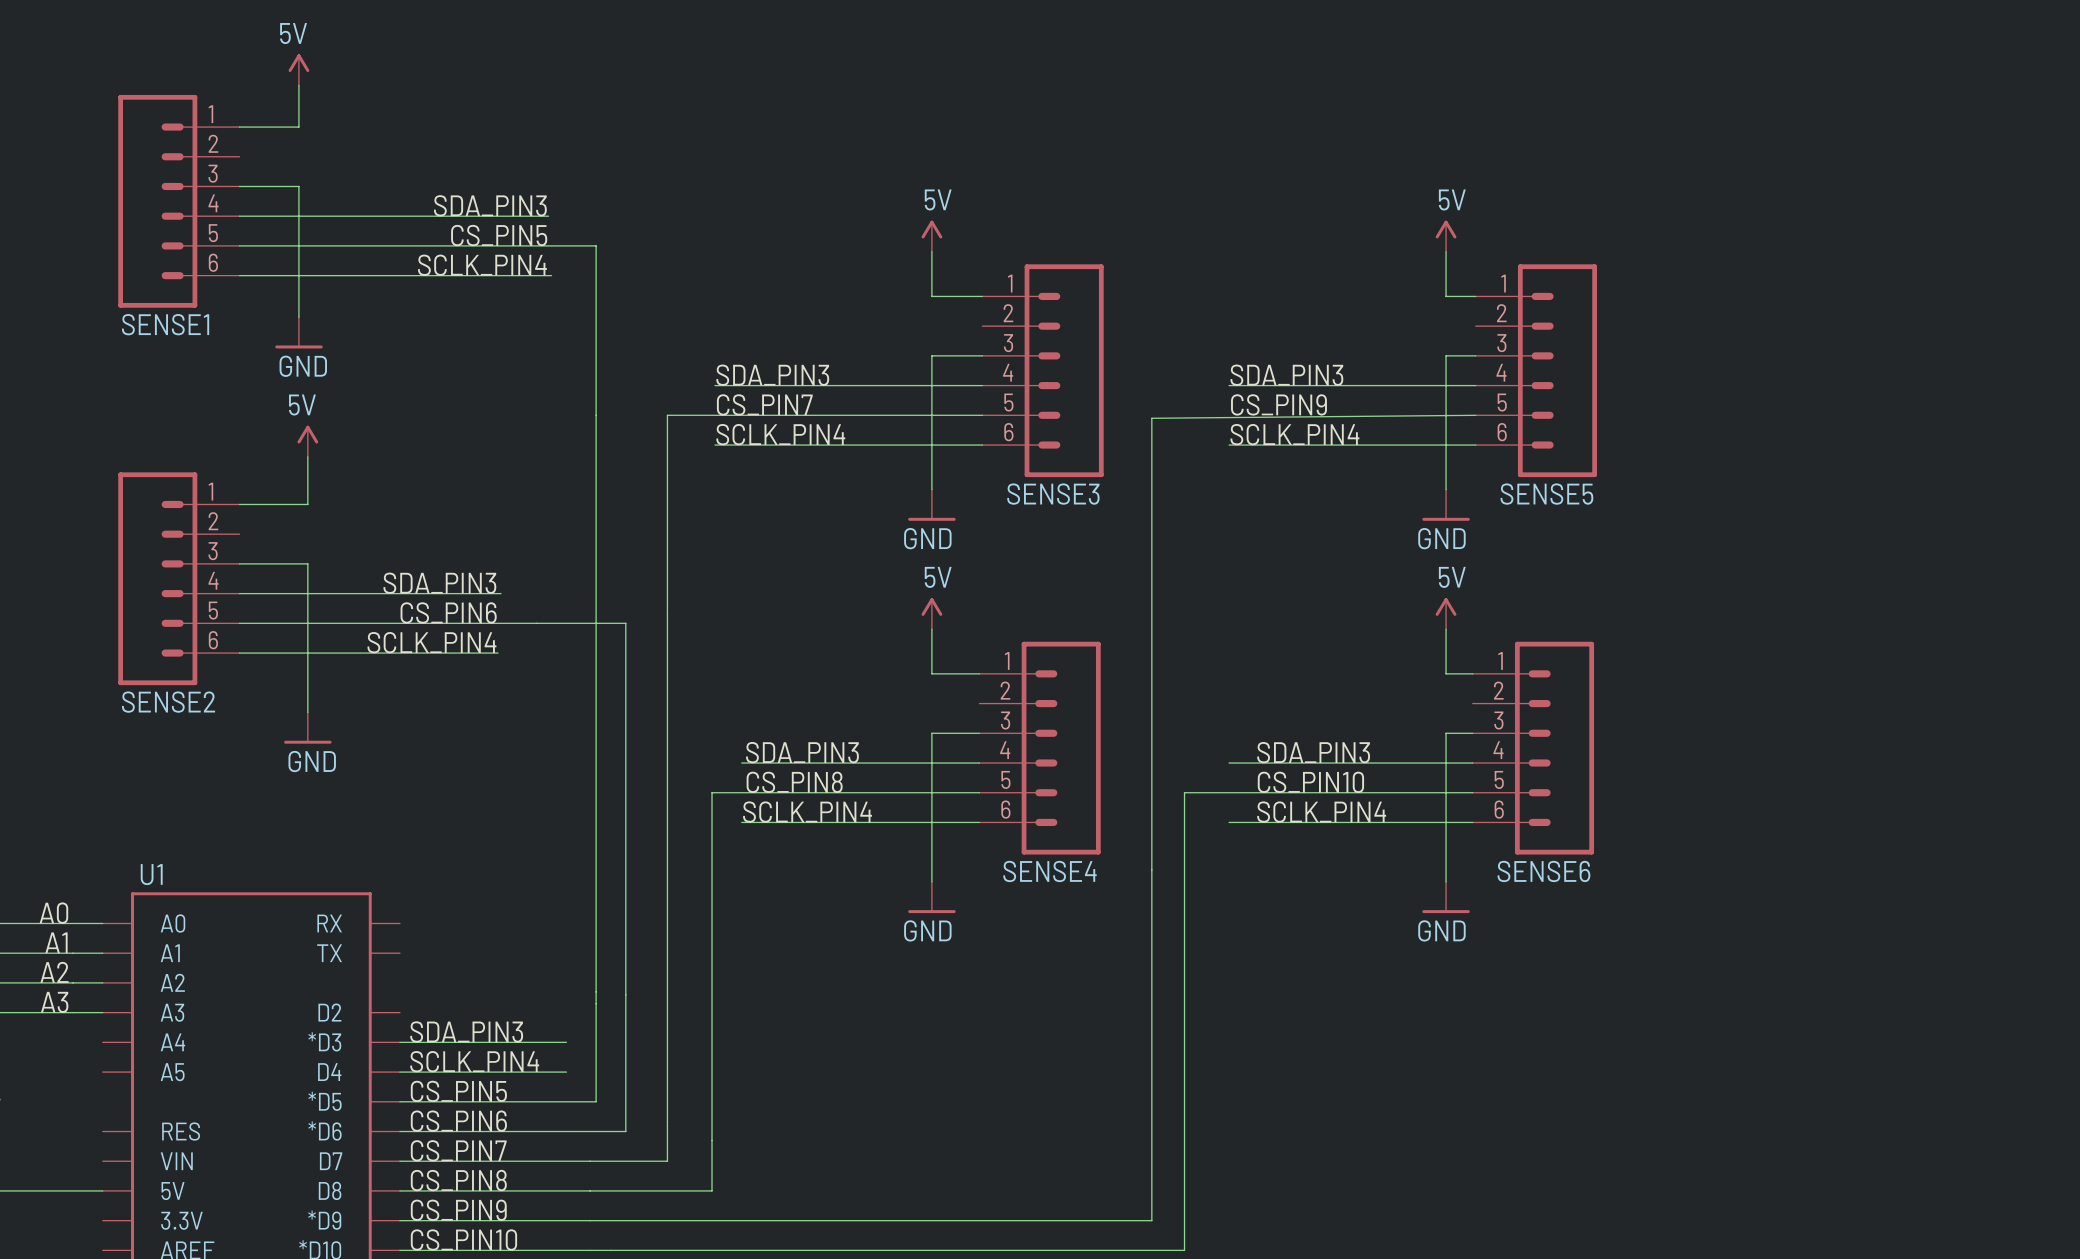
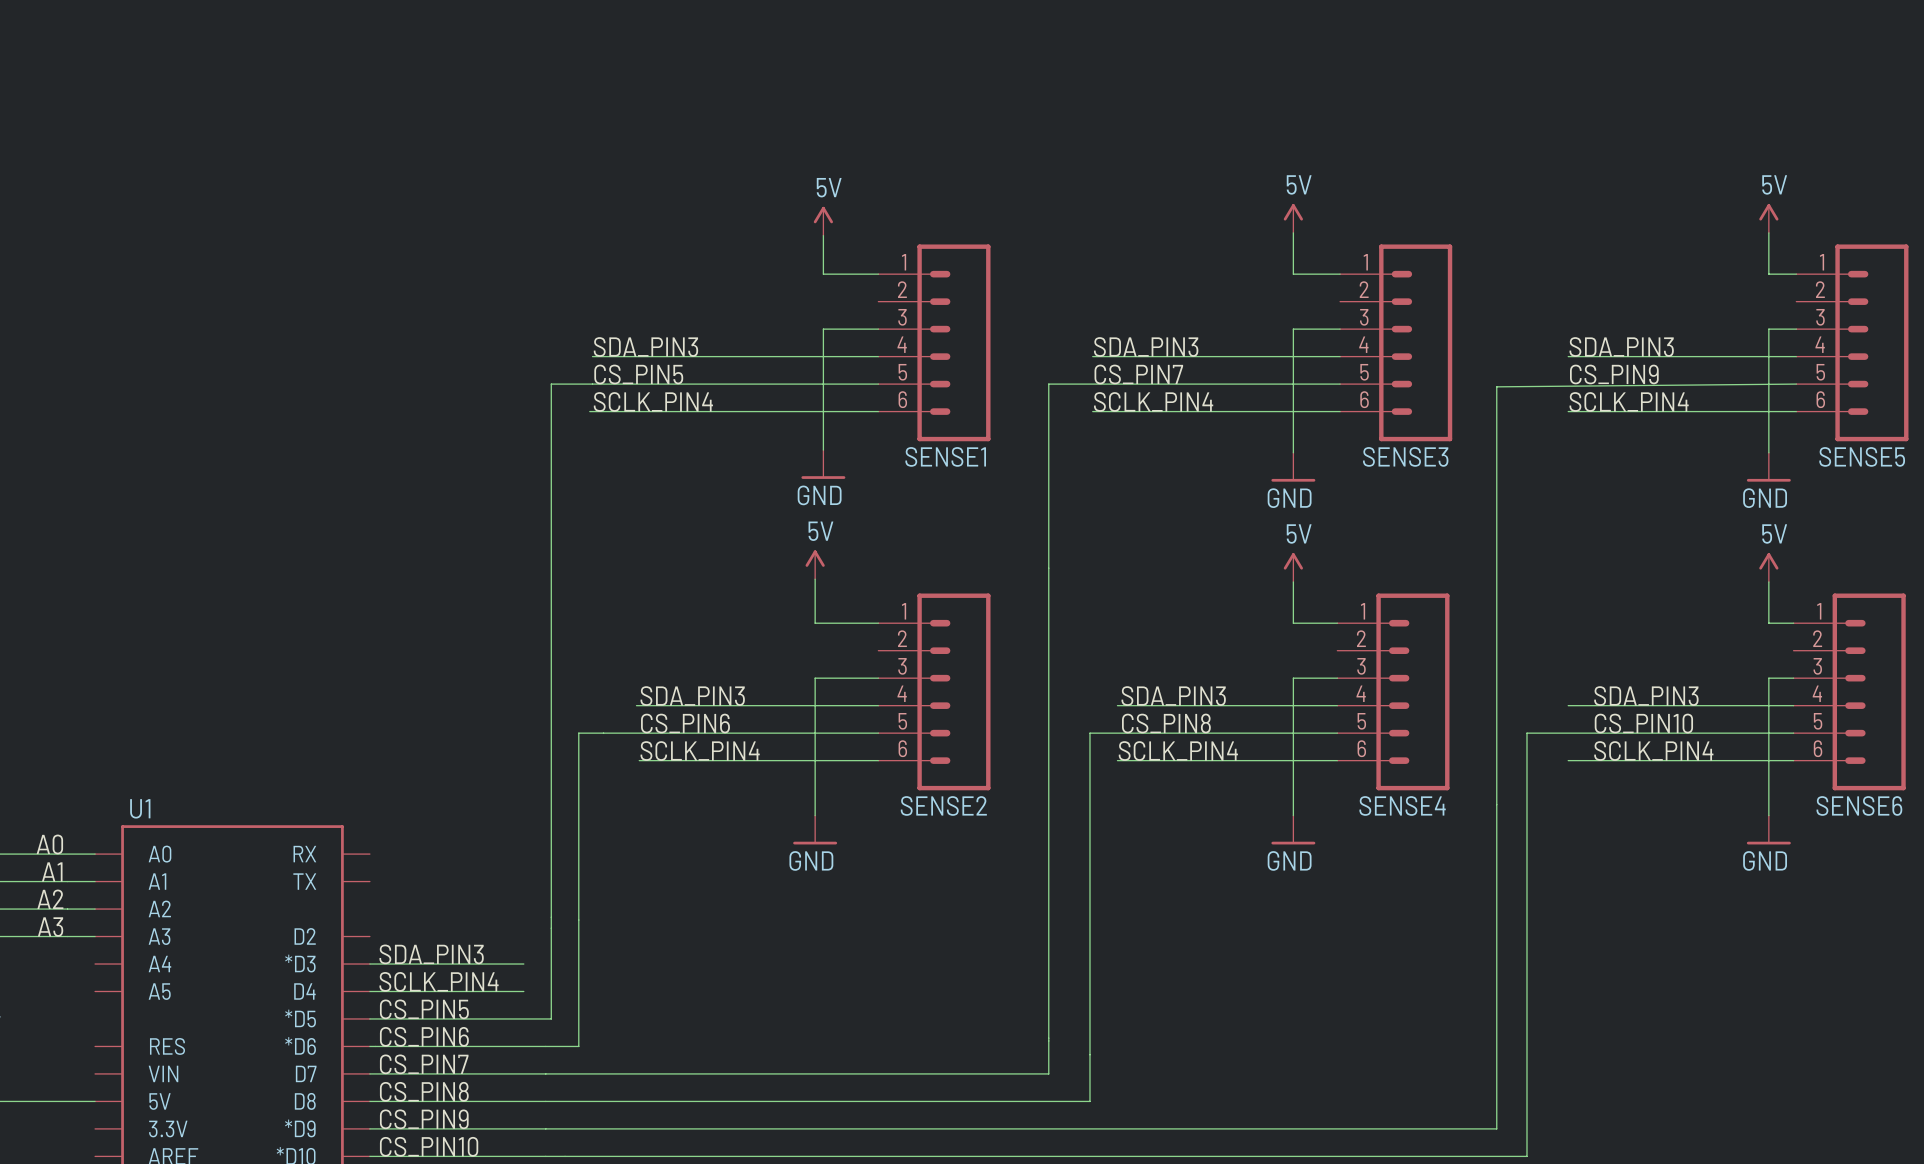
power symbol: 5V (298, 69) -> none
wire: (298, 85) (298, 127) (239, 127) -> none
wire: (239, 186) (298, 186) (298, 317) -> none
SENSE1 flip: as is (157, 201) -> left-right (953, 342)
SENSE1 position: (178, 201) -> (934, 342)
label: SDA_PIN3 (490, 205) -> none
wire: (239, 216) (548, 216) -> none
label position: CS_PIN5 (499, 235) -> CS_PIN5 (638, 374)
power symbol position: 5V (931, 236) -> 5V (823, 221)
power symbol position: 5V (1446, 236) -> 5V (1293, 218)
power symbol: none -> 5V (1768, 218)
wire: (239, 245) (596, 245) (596, 415) -> (617, 384) (551, 384)
wire: (931, 251) (931, 296) -> (823, 235) (823, 274) (861, 274)
wire: (1446, 251) (1446, 296) -> (1293, 232) (1293, 274) (1337, 274)
wire: none -> (1768, 232) (1768, 274) (1796, 274)
label: SCLK_PIN4 (482, 265) -> none
wire: (239, 275) (551, 275) -> none
power symbol: GND (298, 332) -> none
wire: (931, 355) (931, 489) -> (861, 329) (823, 329) (823, 450)
wire: (1446, 355) (1446, 489) -> (1337, 329) (1293, 329) (1293, 452)
wire: none -> (1796, 329) (1768, 329) (1768, 452)
SENSE3 position: (1043, 370) -> (1396, 342)
SENSE5 position: (1536, 370) -> (1852, 342)
label position: SDA_PIN3 (772, 375) -> SDA_PIN3 (645, 346)
label position: SDA_PIN3 (1286, 375) -> SDA_PIN3 (1146, 346)
label: none -> SDA_PIN3 (1621, 346)
wire: none -> (592, 356) (661, 356)
wire: none -> (1092, 356) (1136, 356)
wire: none -> (1568, 356) (1796, 356)
label: CS_PIN7 (764, 404) -> none
label: CS_PIN9 (1278, 404) -> CS_PIN7 (1138, 374)
label: none -> CS_PIN9 (1614, 374)
wire: (667, 415) (667, 1161) -> (1340, 384) (1048, 384) (1048, 1073) (617, 1073)
wire: (1475, 415) (1151, 418) (1151, 1220) -> (1796, 384) (1496, 386) (1496, 1128) (1065, 1128)
label position: SCLK_PIN4 (780, 434) -> SCLK_PIN4 (653, 401)
label position: SCLK_PIN4 (1294, 434) -> SCLK_PIN4 (1153, 401)
label: none -> SCLK_PIN4 (1629, 401)
power symbol: 5V (307, 441) -> none
wire: none -> (589, 411) (661, 411)
wire: none -> (1092, 411) (1136, 411)
wire: none -> (1568, 411) (1796, 411)
wire: (307, 456) (307, 504) (239, 504) -> none
power symbol position: GND (931, 505) -> GND (823, 464)
power symbol position: GND (1446, 505) -> GND (1293, 467)
power symbol: none -> GND (1768, 467)
wire: (239, 563) (307, 563) (307, 712) -> none
SENSE2 flip: as is (157, 578) -> left-right (953, 691)
SENSE2 position: (178, 578) -> (934, 691)
label: SDA_PIN3 (439, 583) -> none
wire: (239, 593) (501, 593) -> none
label position: CS_PIN6 (448, 612) -> CS_PIN6 (685, 723)
power symbol position: 5V (931, 613) -> 5V (815, 564)
power symbol position: 5V (1446, 613) -> 5V (1293, 567)
power symbol: none -> 5V (1768, 567)
wire: (239, 623) (625, 623) (625, 792) -> none
wire: (931, 629) (931, 673) -> (815, 579) (815, 623) (861, 623)
wire: none -> (1293, 581) (1293, 623) (1337, 623)
wire: (1446, 629) (1446, 673) (1472, 673) -> none
wire: none -> (1768, 581) (1768, 623) (1793, 623)
label: SCLK_PIN4 (431, 642) -> none
wire: (239, 653) (498, 653) -> none
power symbol: GND (307, 728) -> none
wire: (931, 733) (931, 881) -> (861, 678) (815, 678) (815, 815)
wire: none -> (1337, 678) (1293, 678) (1293, 815)
wire: (1472, 733) (1446, 733) (1446, 881) -> none
wire: none -> (1793, 678) (1768, 678) (1768, 815)
SENSE4 position: (1040, 748) -> (1393, 691)
SENSE6 position: (1533, 748) -> (1849, 691)
label position: SDA_PIN3 (802, 752) -> SDA_PIN3 (692, 696)
label position: SDA_PIN3 (1313, 752) -> SDA_PIN3 (1173, 696)
label: none -> SDA_PIN3 (1646, 696)
wire: none -> (636, 705) (685, 705)
wire: none -> (1117, 705) (1136, 705)
wire: none -> (1568, 705) (1793, 705)
label: CS_PIN8 (794, 782) -> none
label: CS_PIN10 (1310, 782) -> CS_PIN8 (1166, 723)
label: none -> CS_PIN10 (1643, 723)
wire: (712, 792) (712, 1190) -> (658, 733) (578, 733)
wire: (1184, 792) (1184, 1250) -> (1095, 733) (1089, 733) (1089, 1101) (658, 1101)
wire: none -> (1793, 733) (1526, 733) (1526, 1156) (1095, 1156)
label position: SCLK_PIN4 (807, 812) -> SCLK_PIN4 (700, 751)
label position: SCLK_PIN4 (1321, 812) -> SCLK_PIN4 (1178, 751)
label: none -> SCLK_PIN4 (1653, 751)
wire: none -> (639, 760) (685, 760)
wire: none -> (1117, 760) (1136, 760)
wire: none -> (1568, 760) (1793, 760)
power symbol position: GND (931, 897) -> GND (815, 830)
power symbol position: GND (1446, 897) -> GND (1293, 830)
power symbol: none -> GND (1768, 830)

